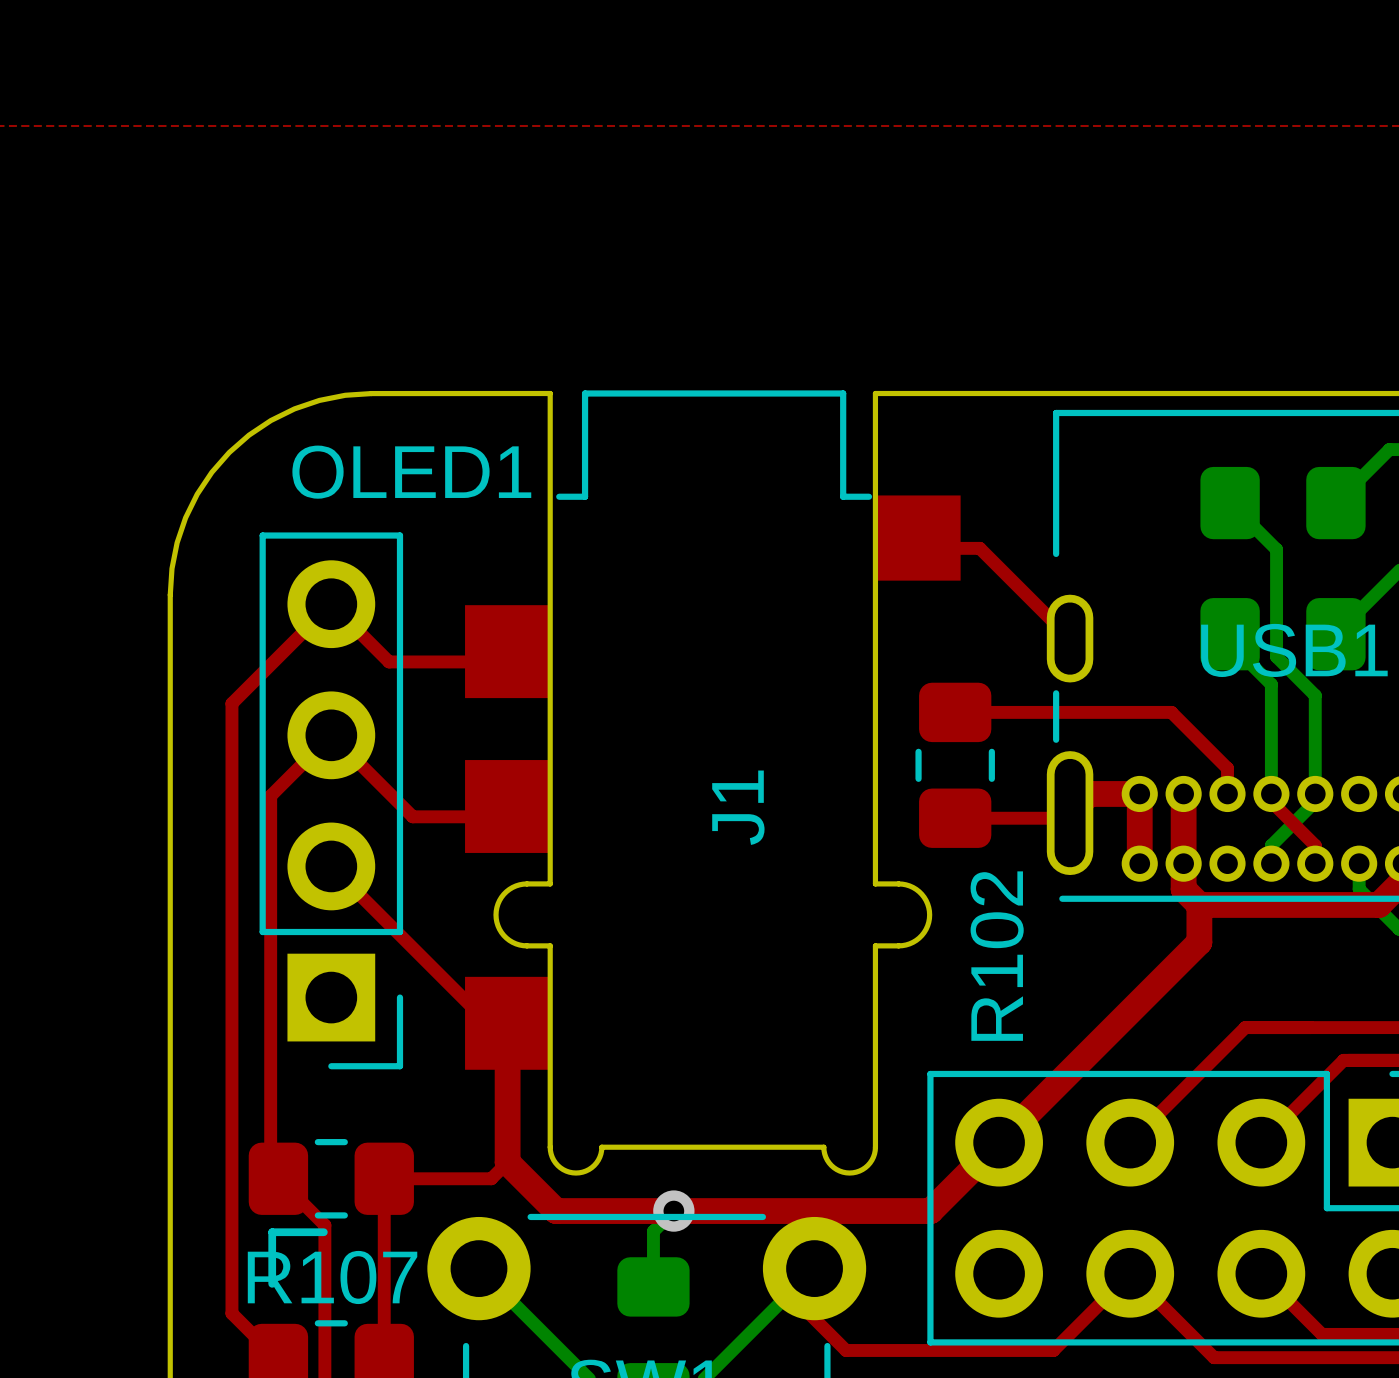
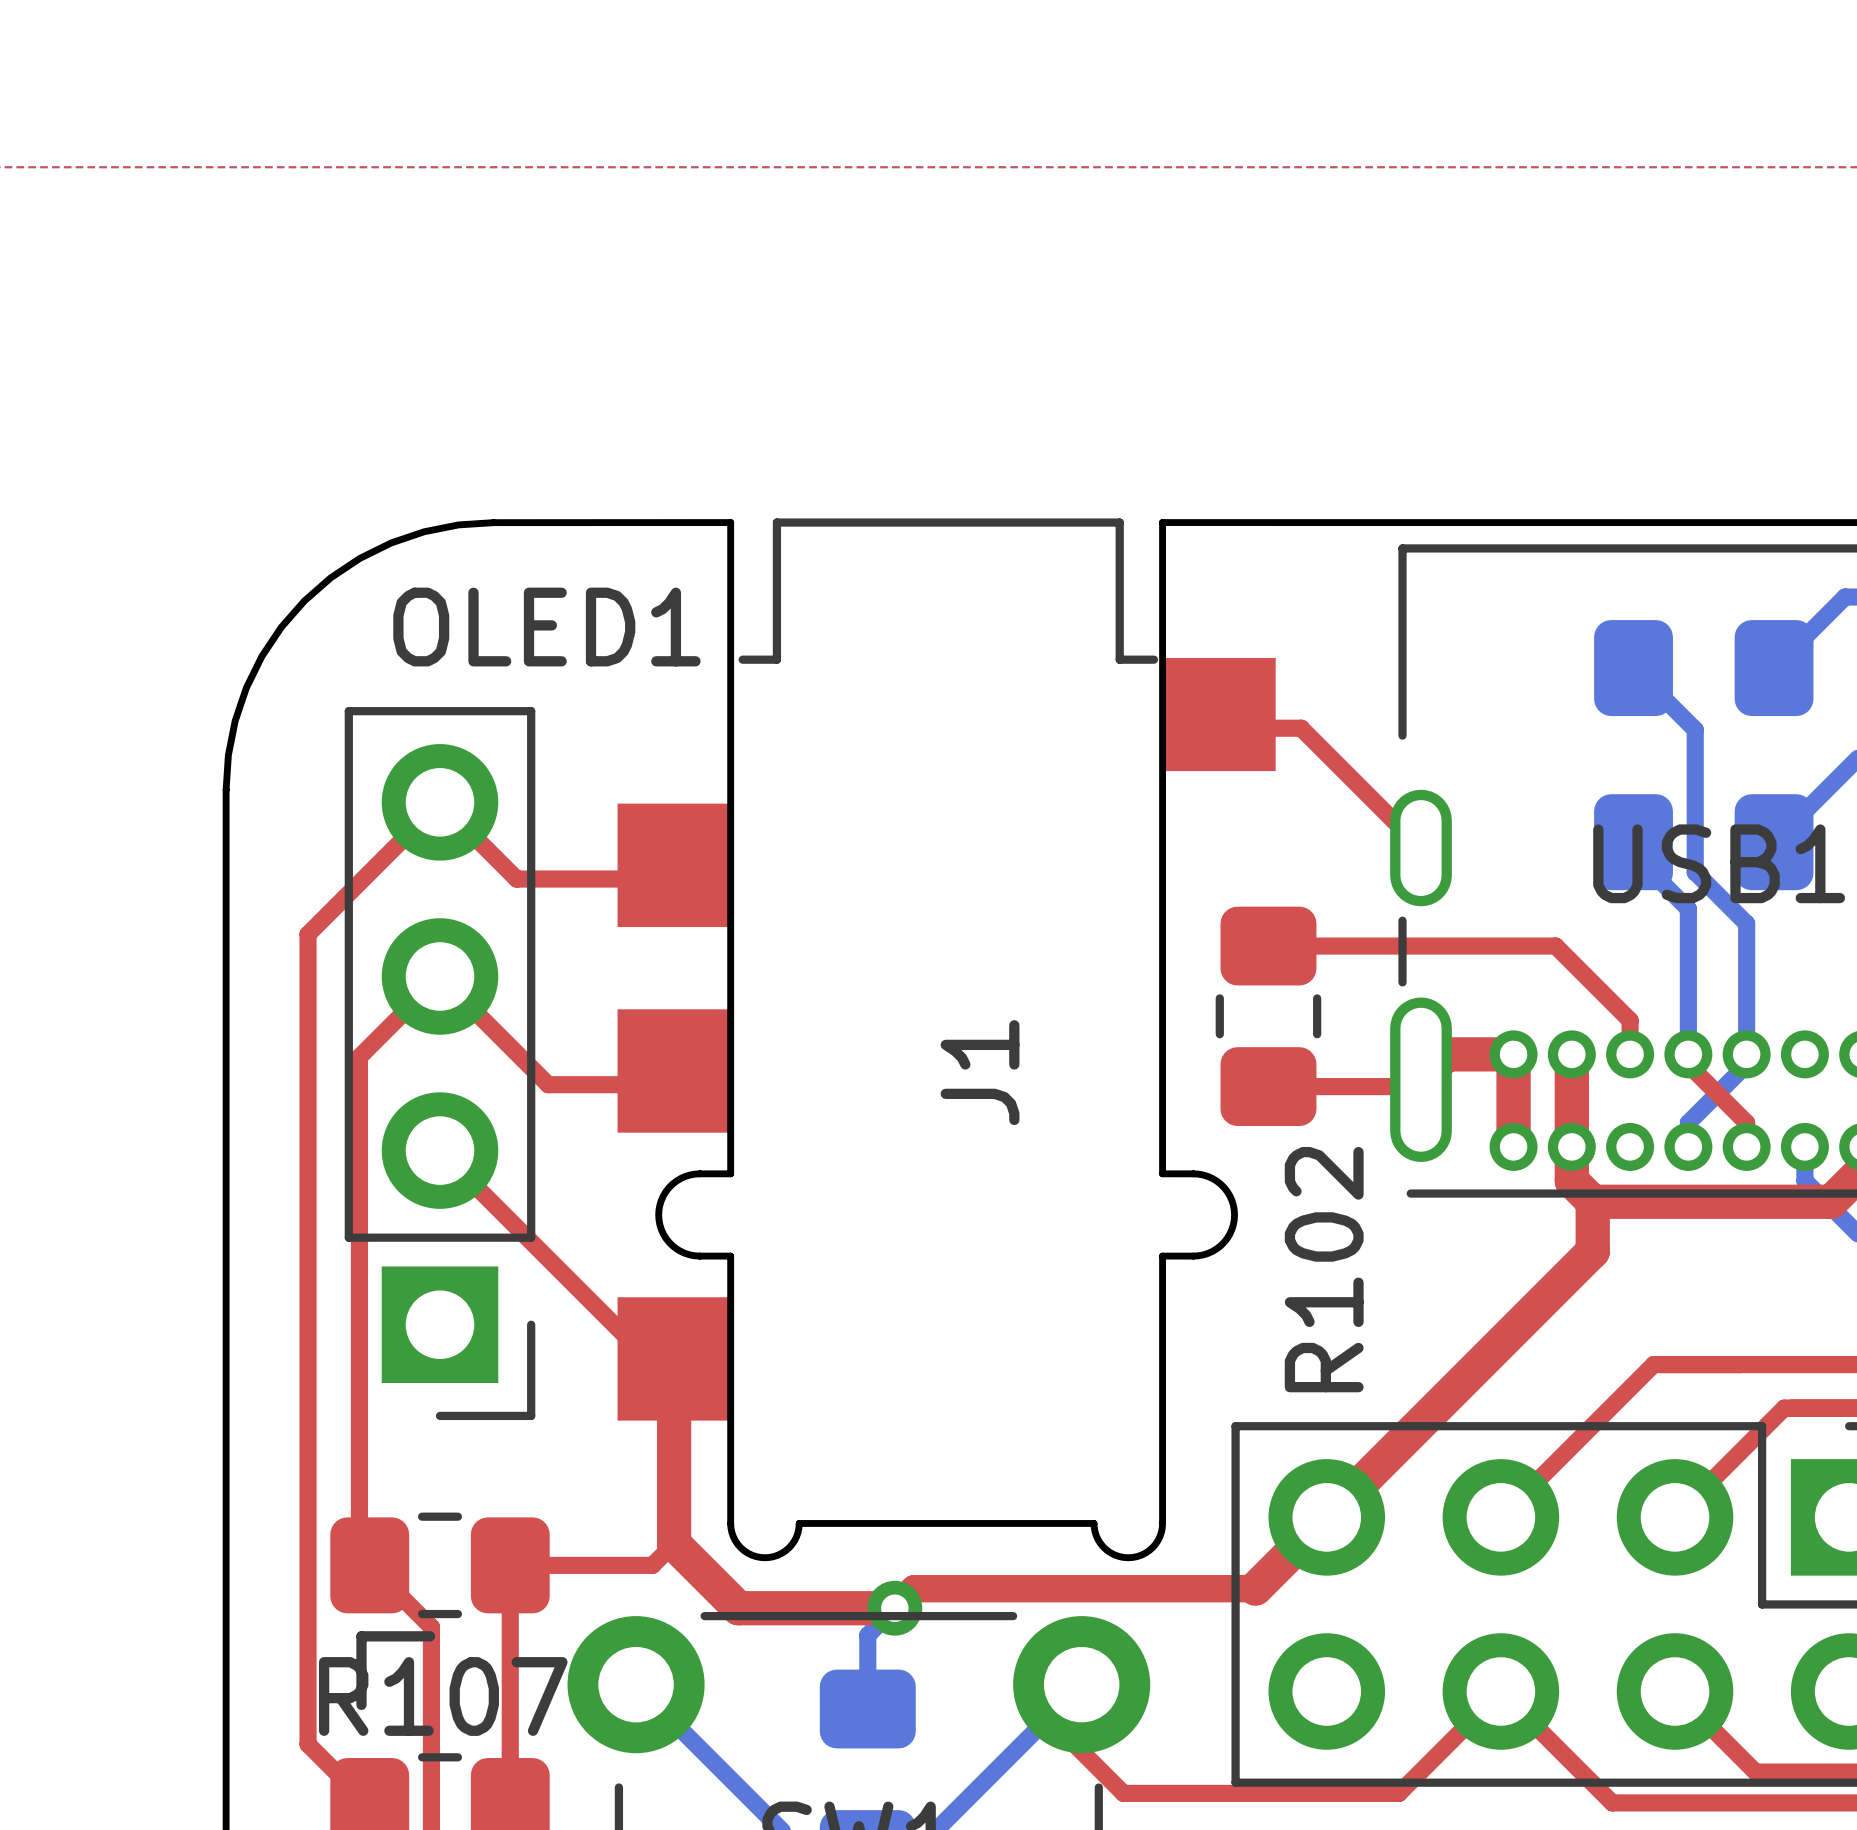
top track: (945, 1196) (930, 1211) (673, 1211) -> (1255, 1588) (914, 1588) (894, 1608)

